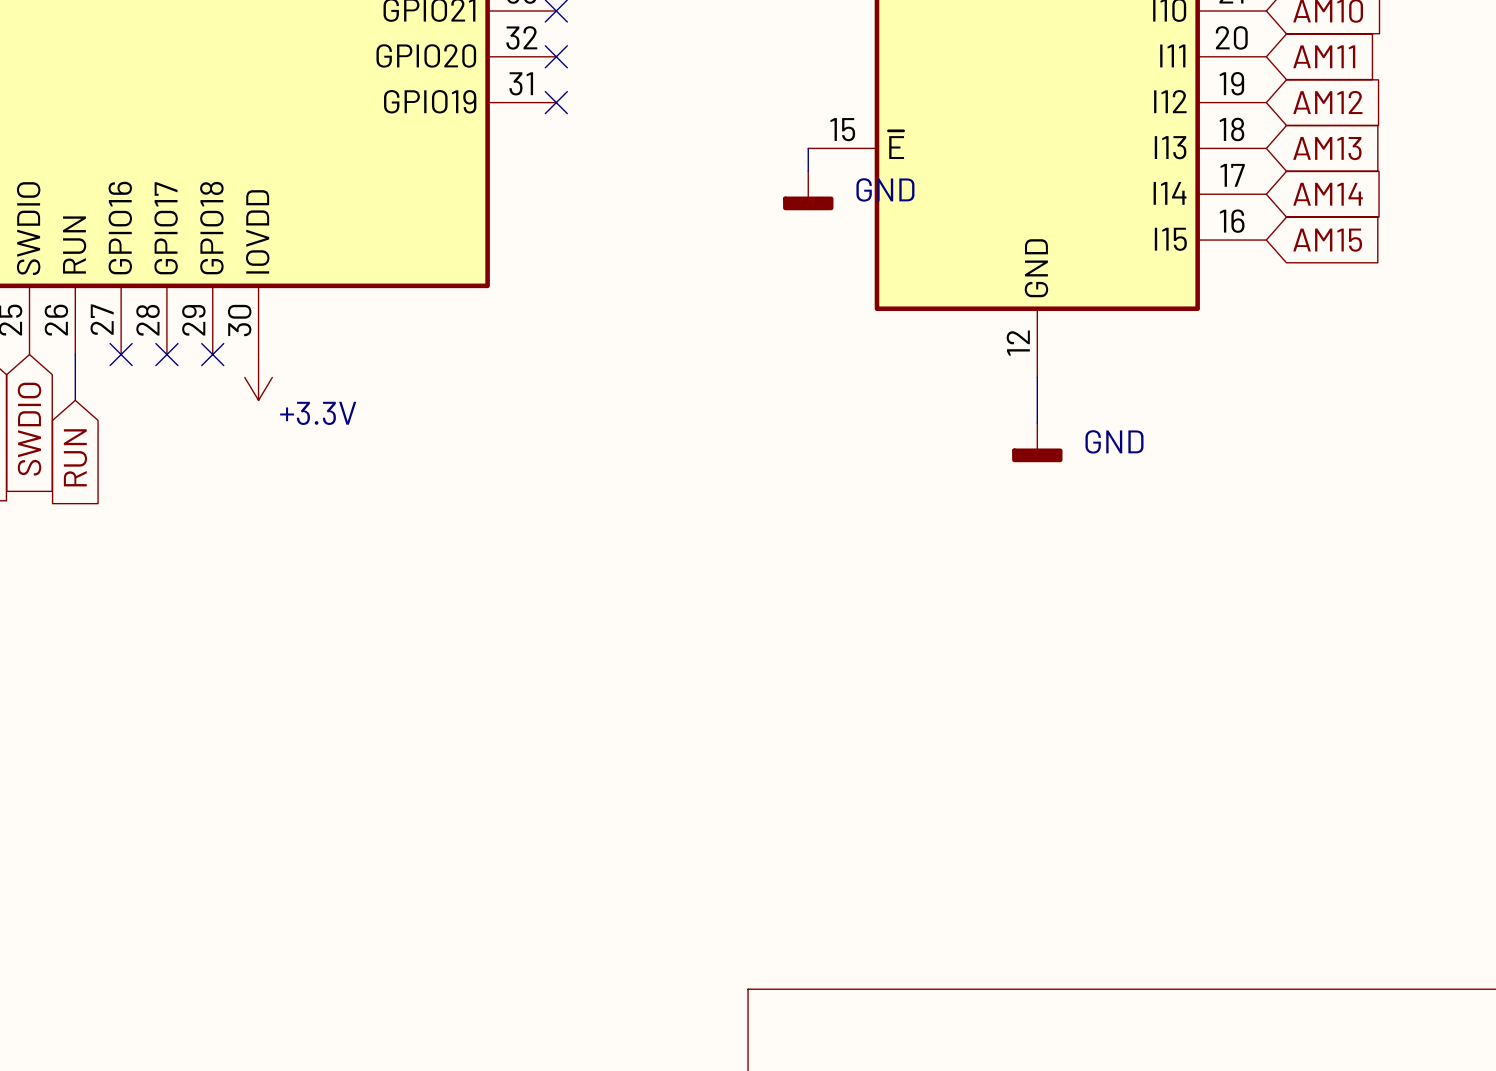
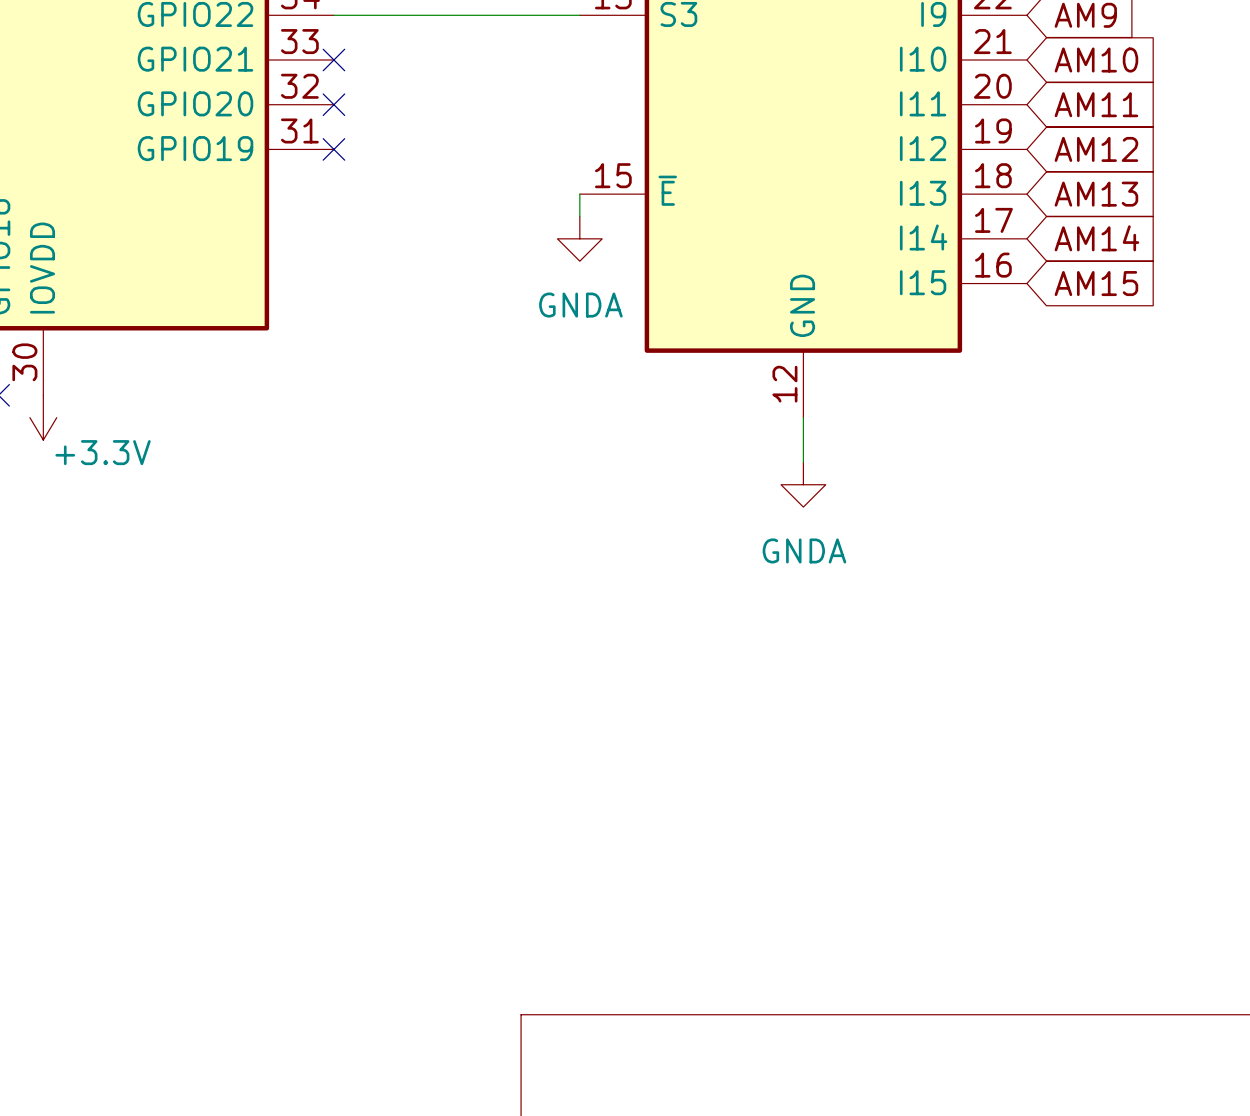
power symbol: GND (808, 190) -> GNDA (579, 238)
power symbol: GND (1037, 442) -> GNDA (803, 484)

